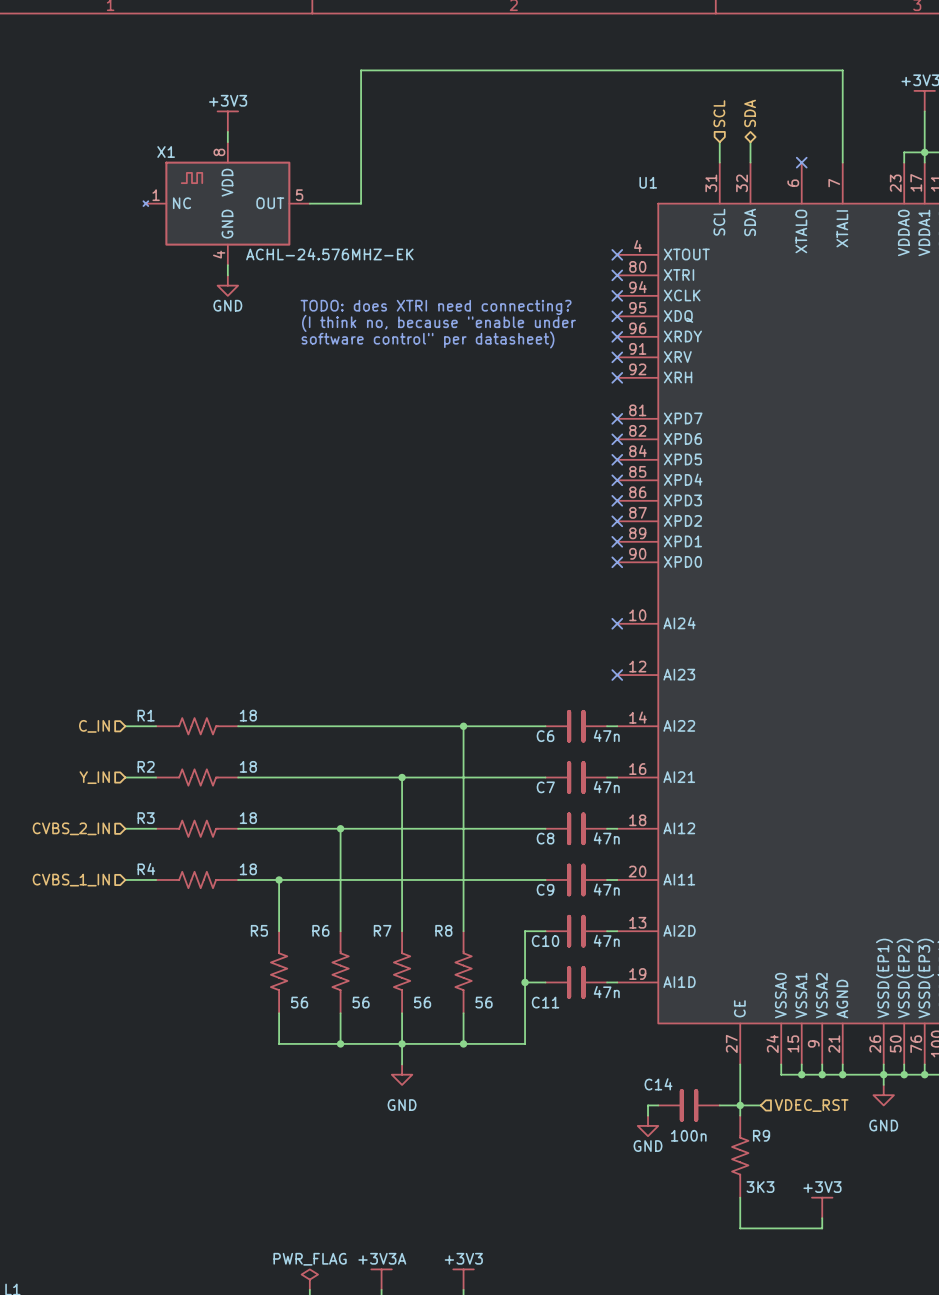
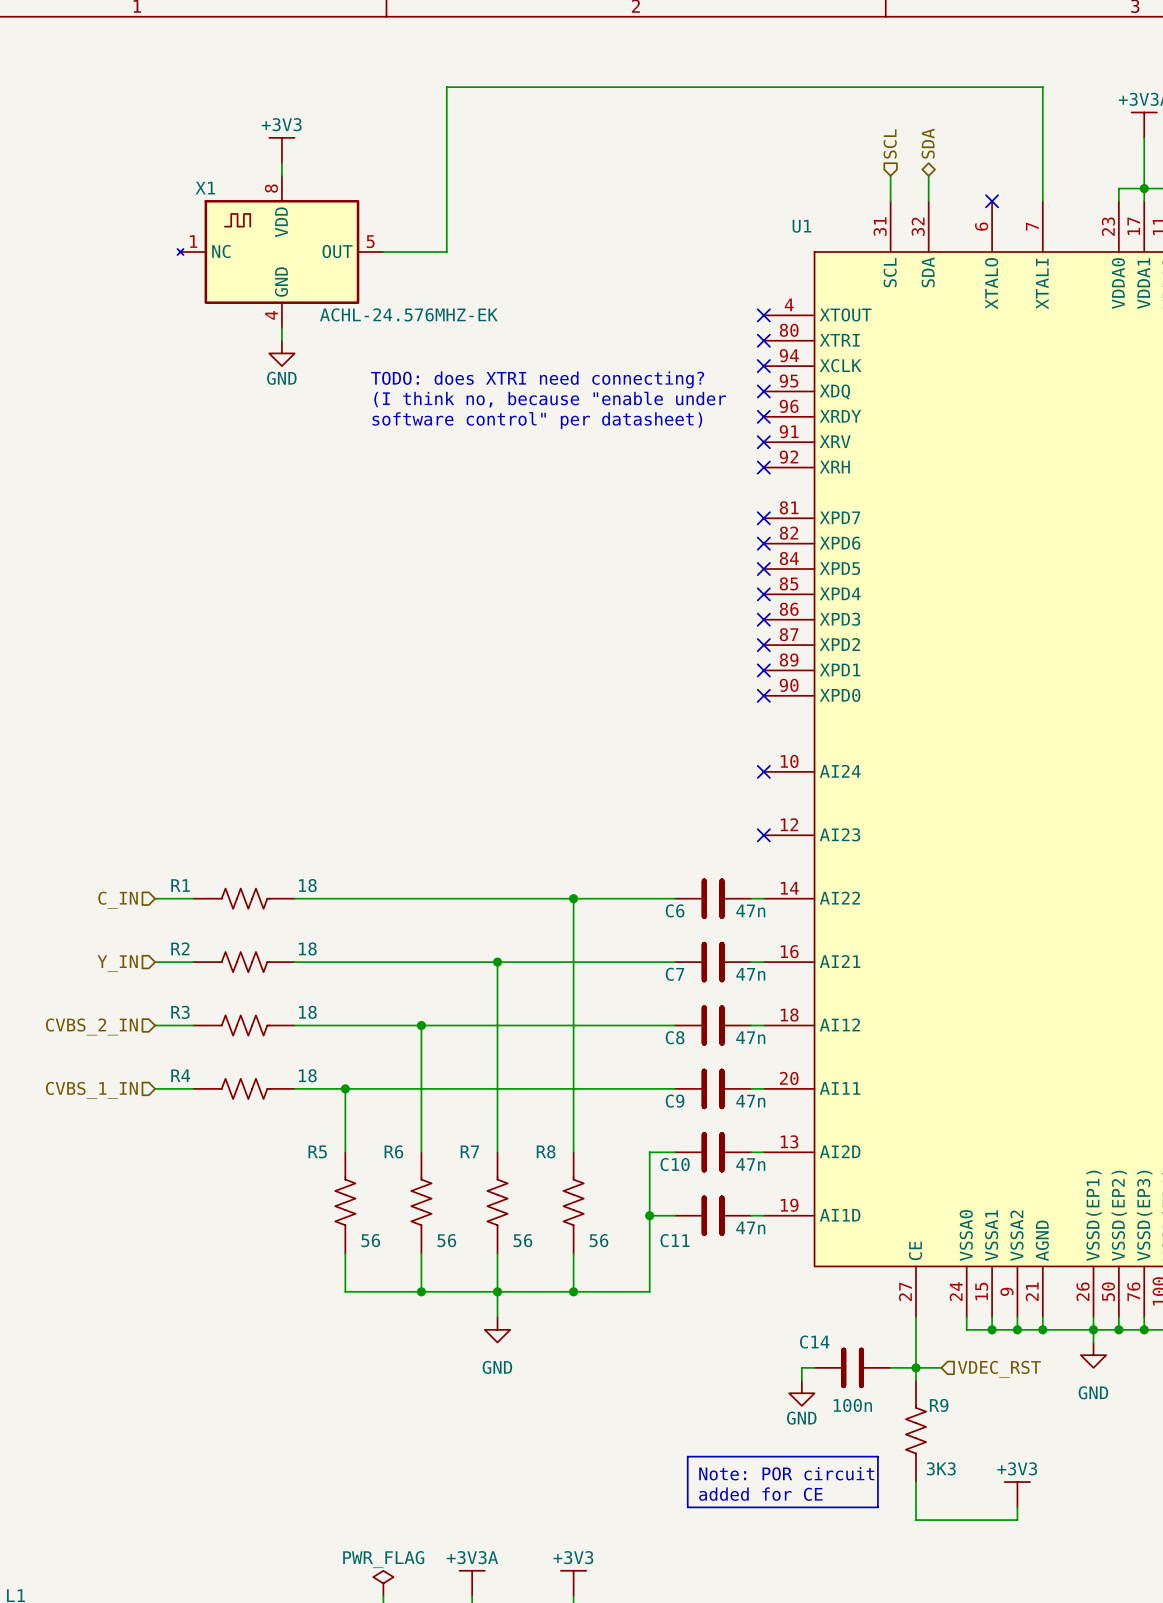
line: none -> (687, 1456) (877, 1456) (877, 1507) (687, 1507) (687, 1456)
text: none -> Note: POR circuit (786, 1473)
text: none -> added for CE (760, 1494)

